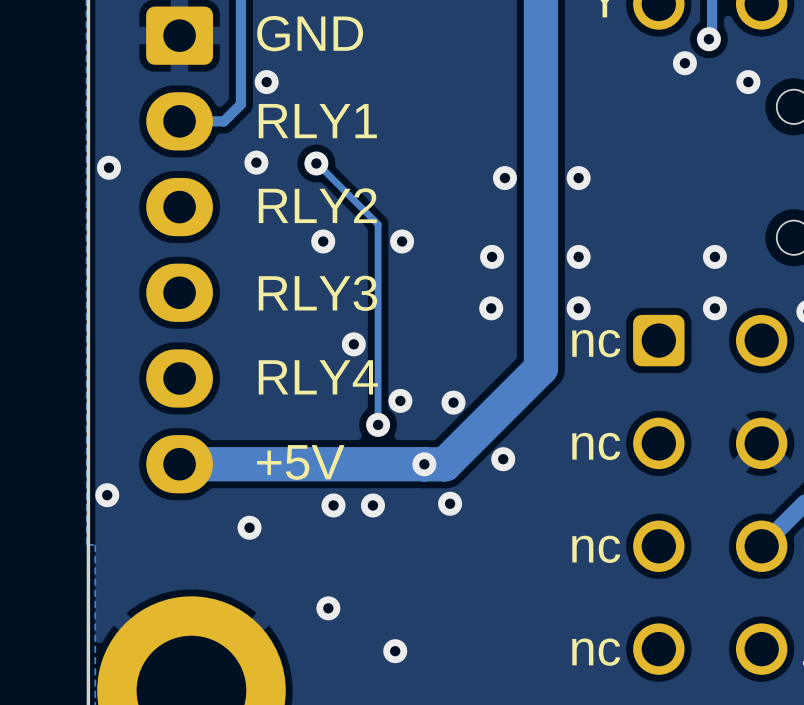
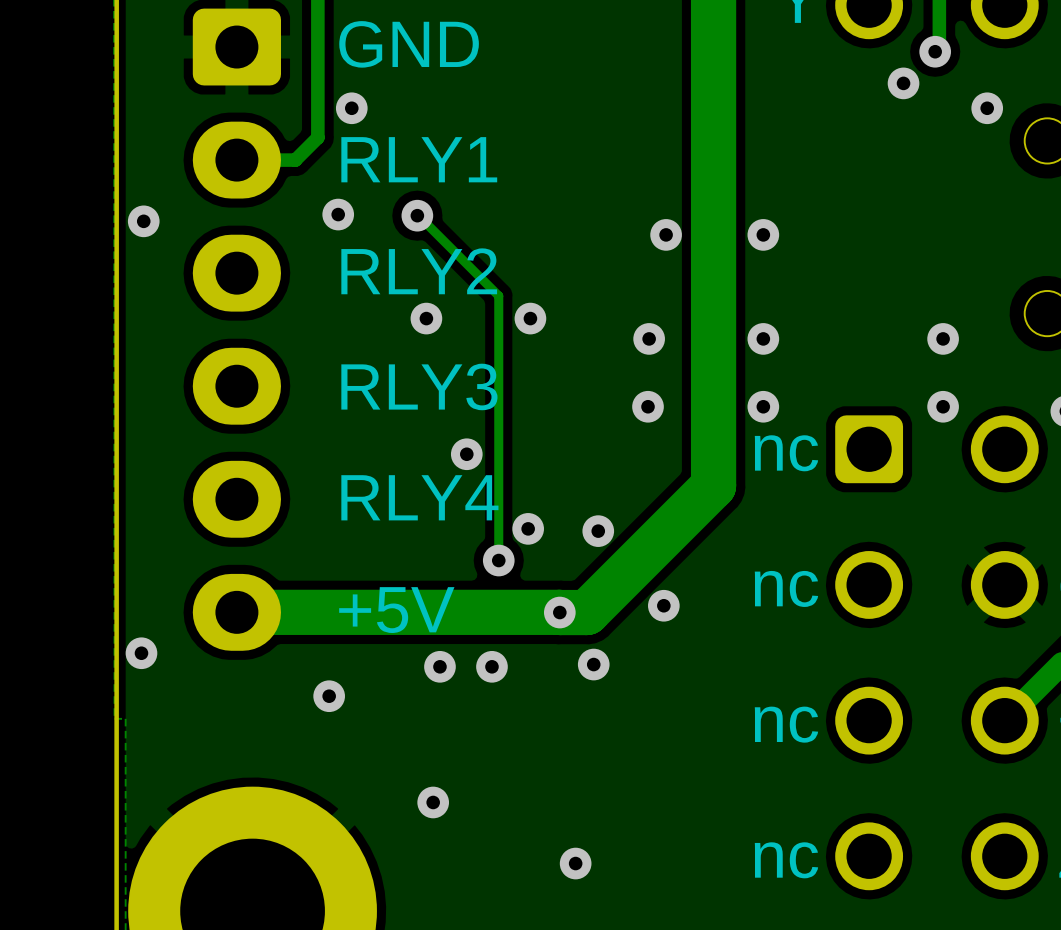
via position: (395, 651) -> (575, 863)

